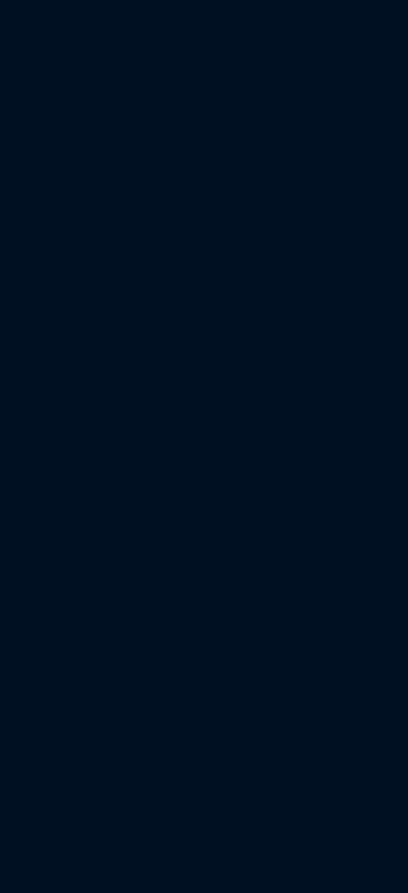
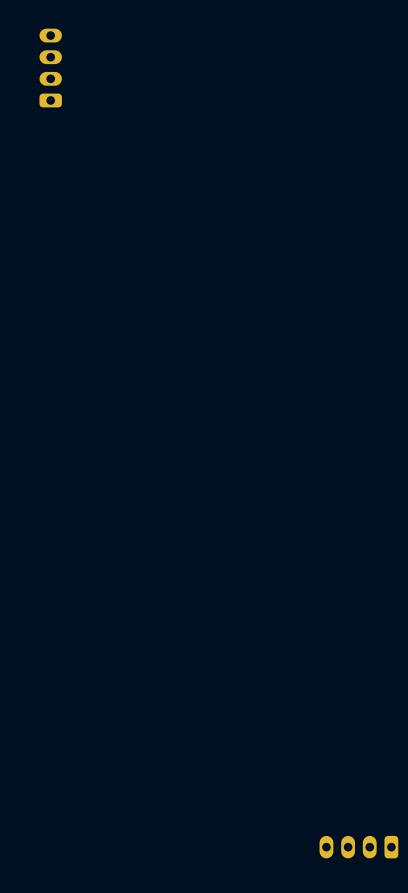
part: none -> (50, 68)
part: none -> (358, 847)

